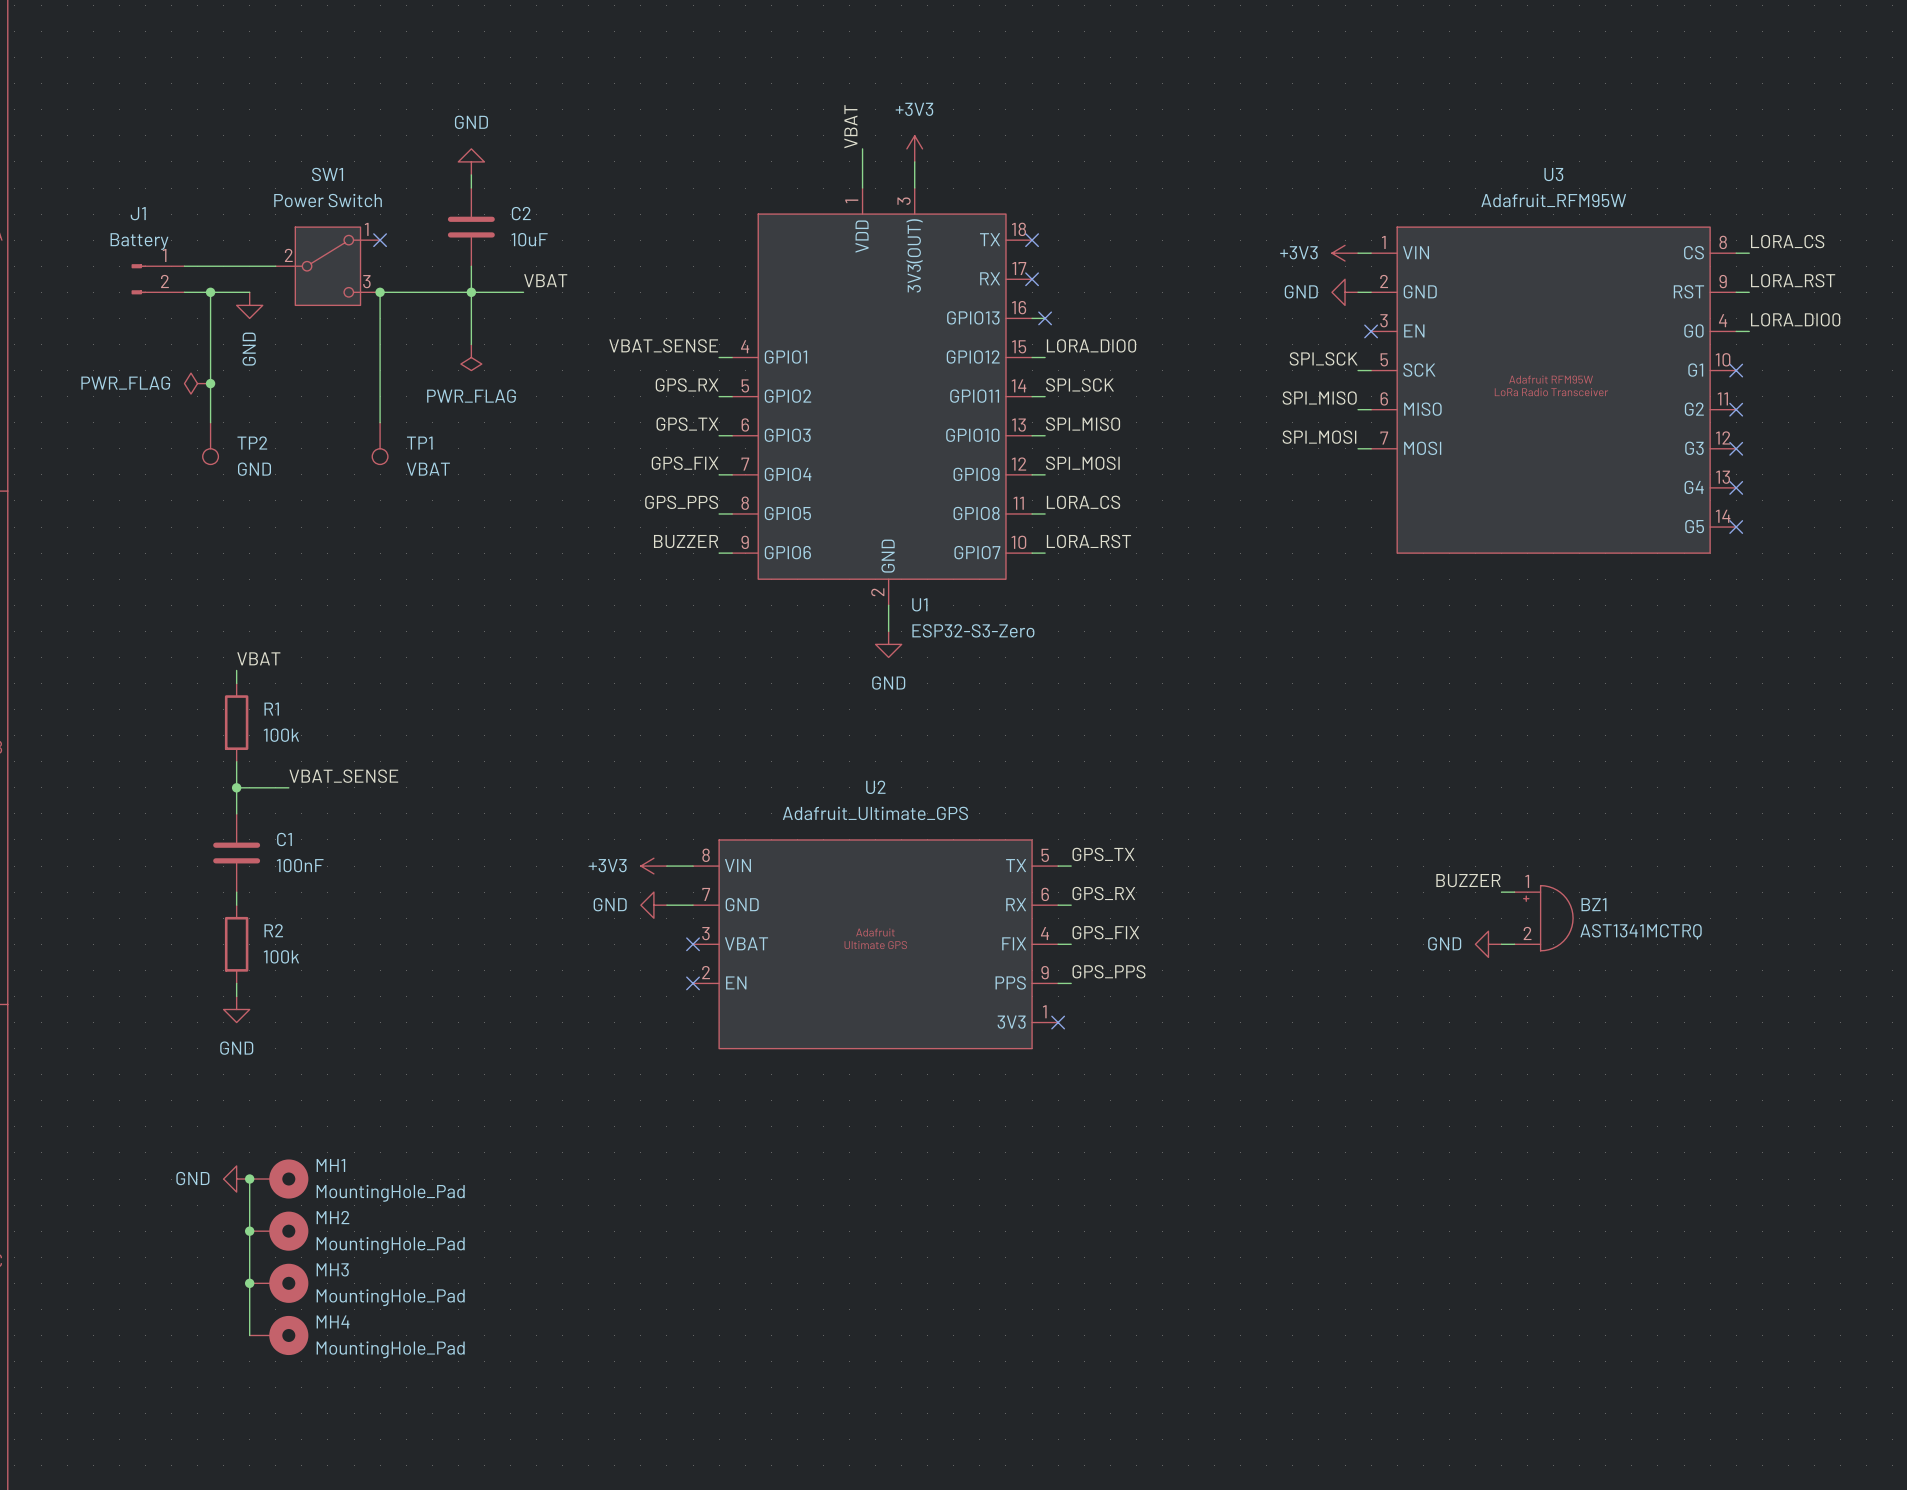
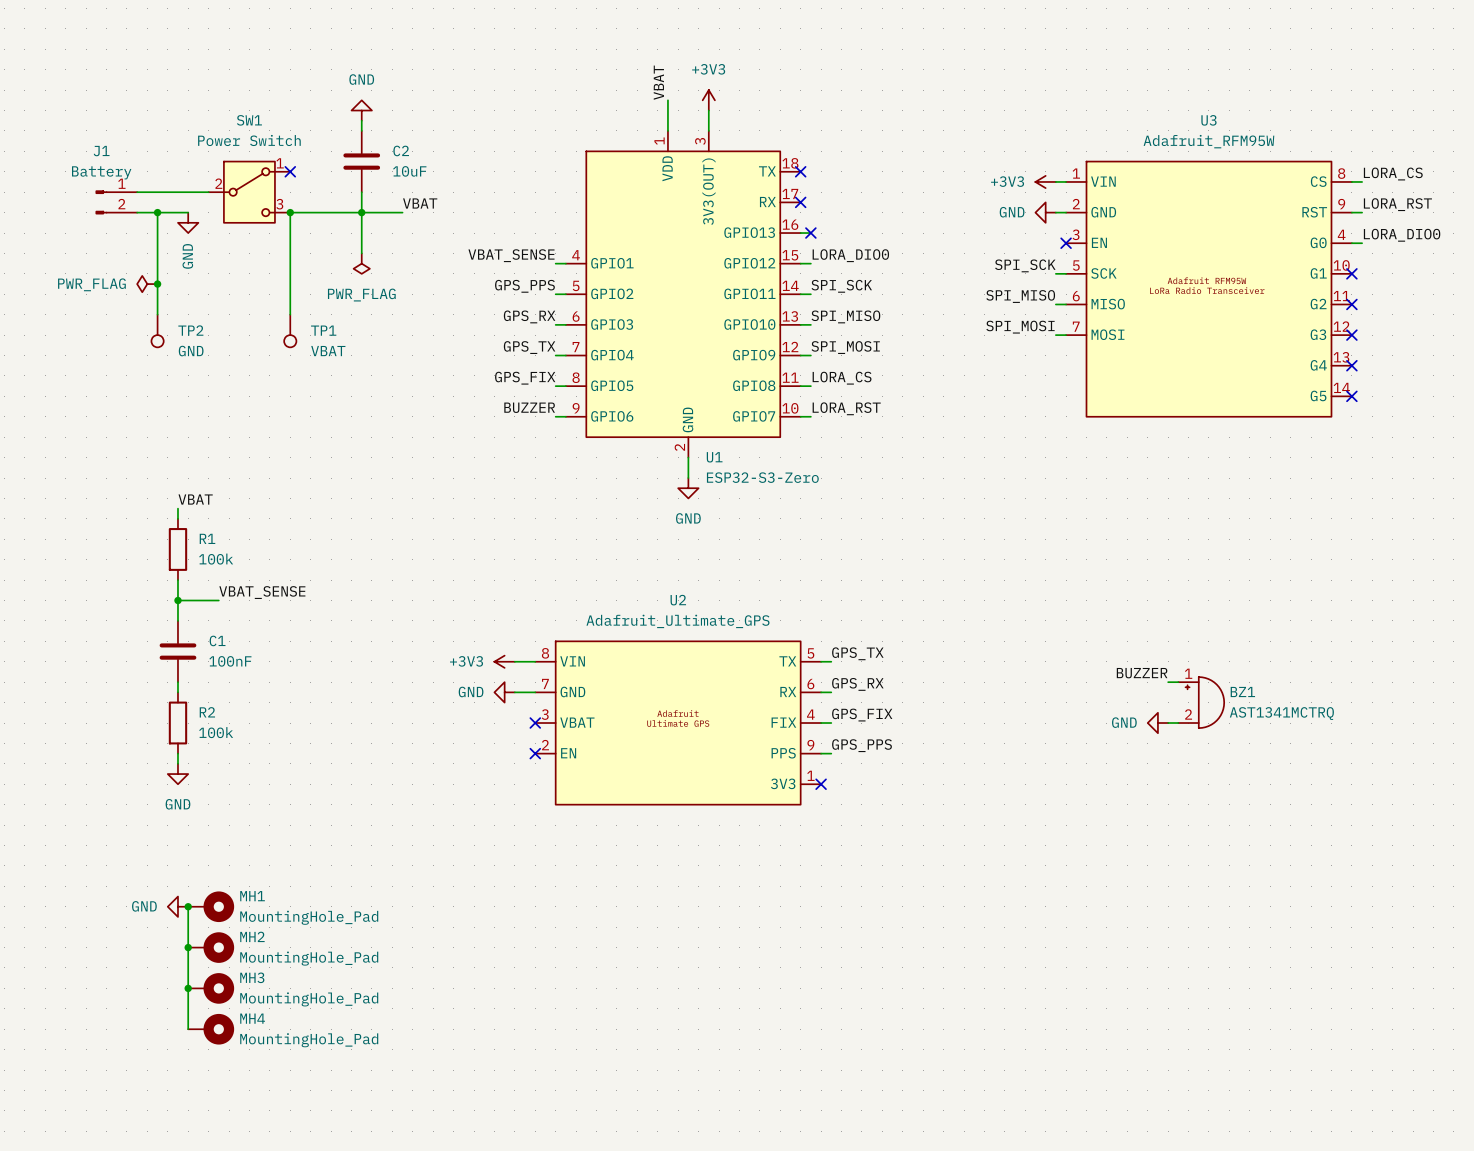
label: GPS_RX (687, 384) -> GPS_PPS (524, 286)
label: GPS_TX (687, 424) -> GPS_RX (529, 316)
label: GPS_FIX (685, 463) -> GPS_TX (529, 347)
label: GPS_PPS (681, 502) -> GPS_FIX (525, 378)

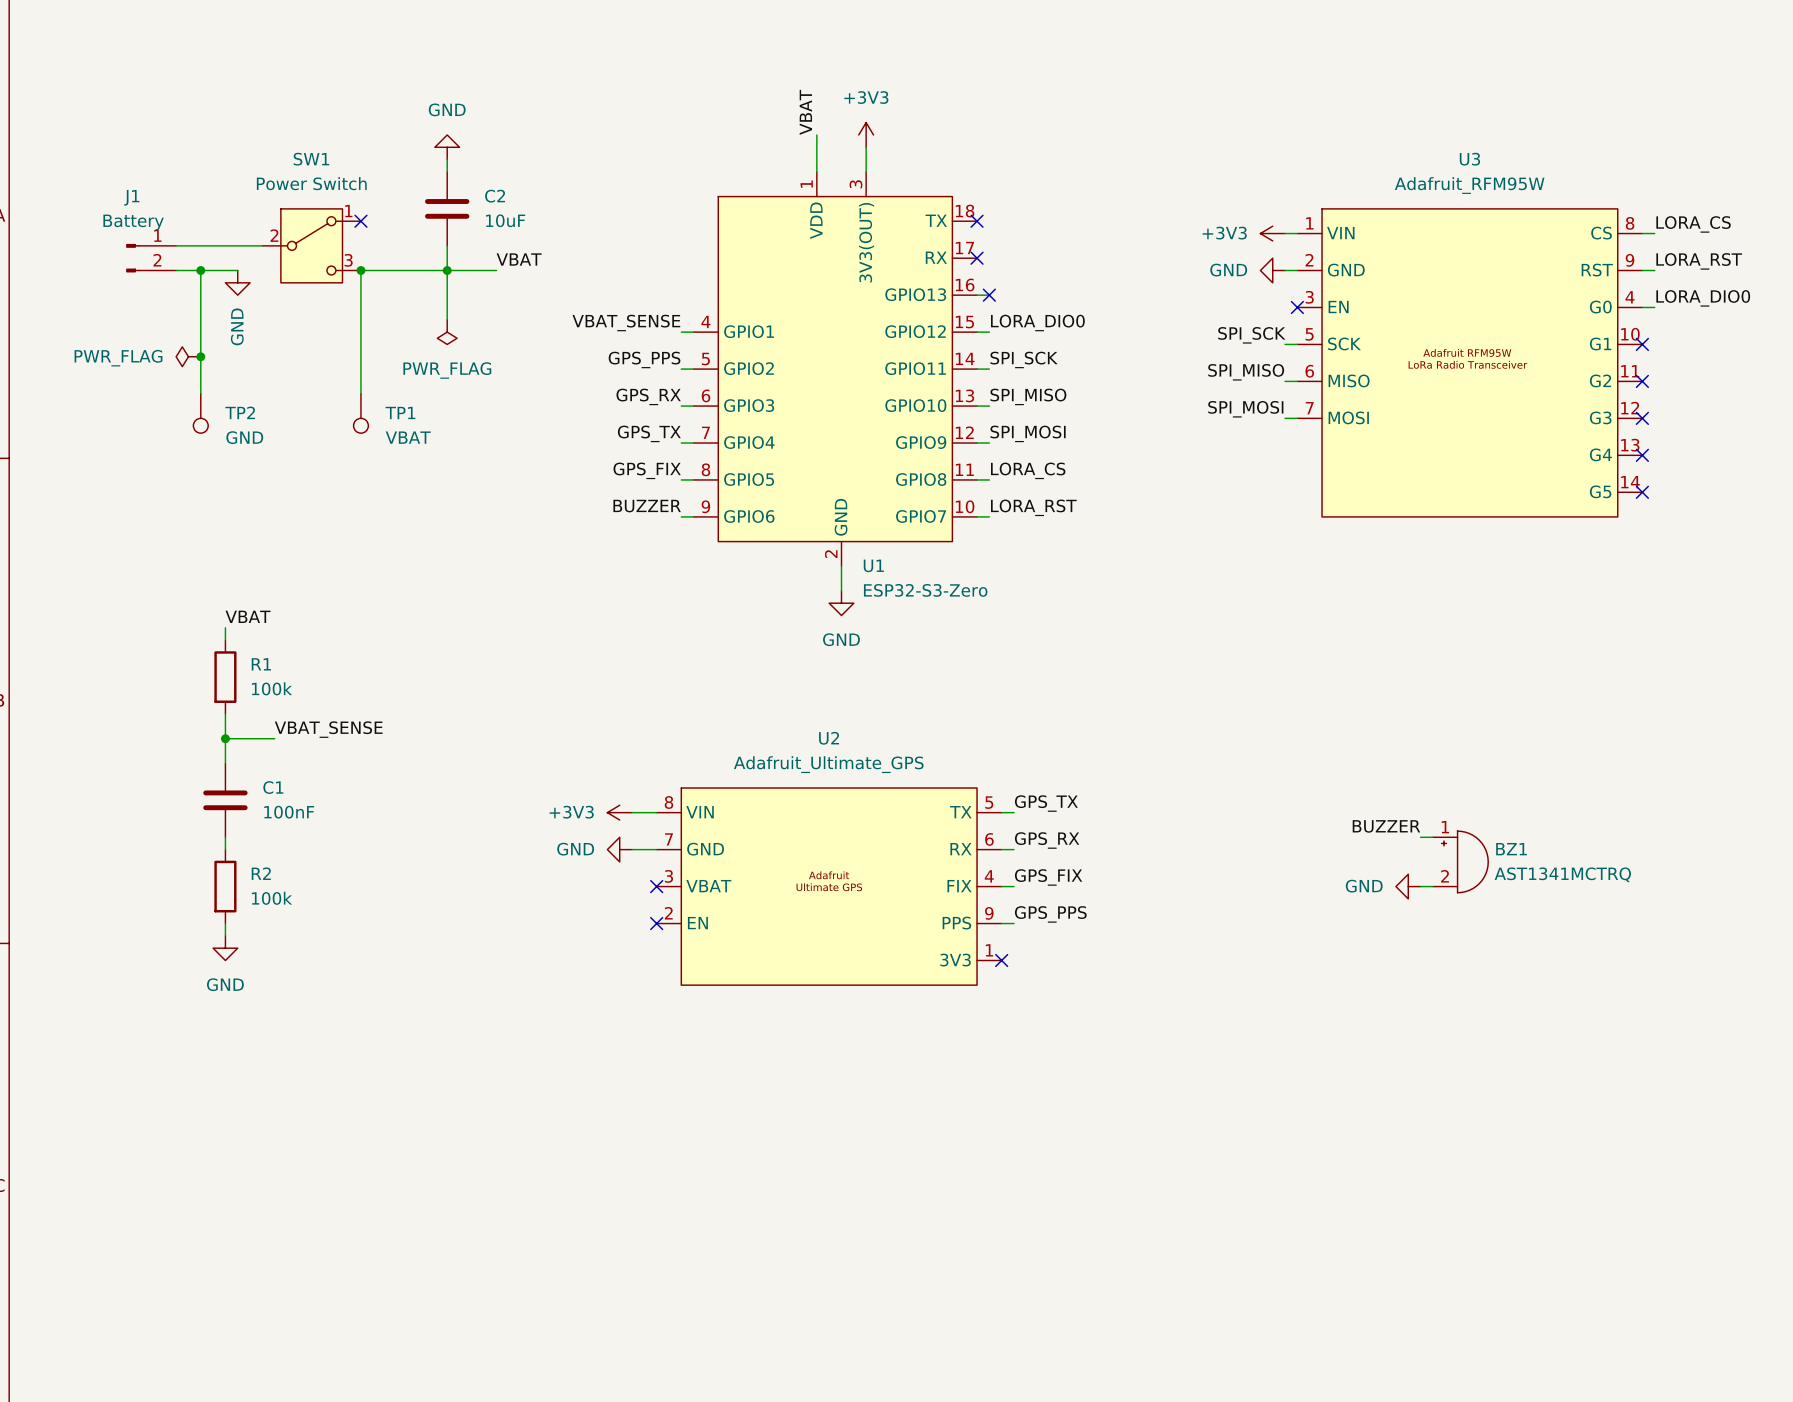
power symbol: GND (177, 906) -> none
wire: (188, 906) (188, 1029) -> none
junction: (188, 906) -> none
MH1: MountingHole_Pad (211, 906) -> none
junction: (188, 947) -> none
MH2: MountingHole_Pad (211, 947) -> none
junction: (188, 988) -> none
MH3: MountingHole_Pad (211, 988) -> none
MH4: MountingHole_Pad (211, 1029) -> none

